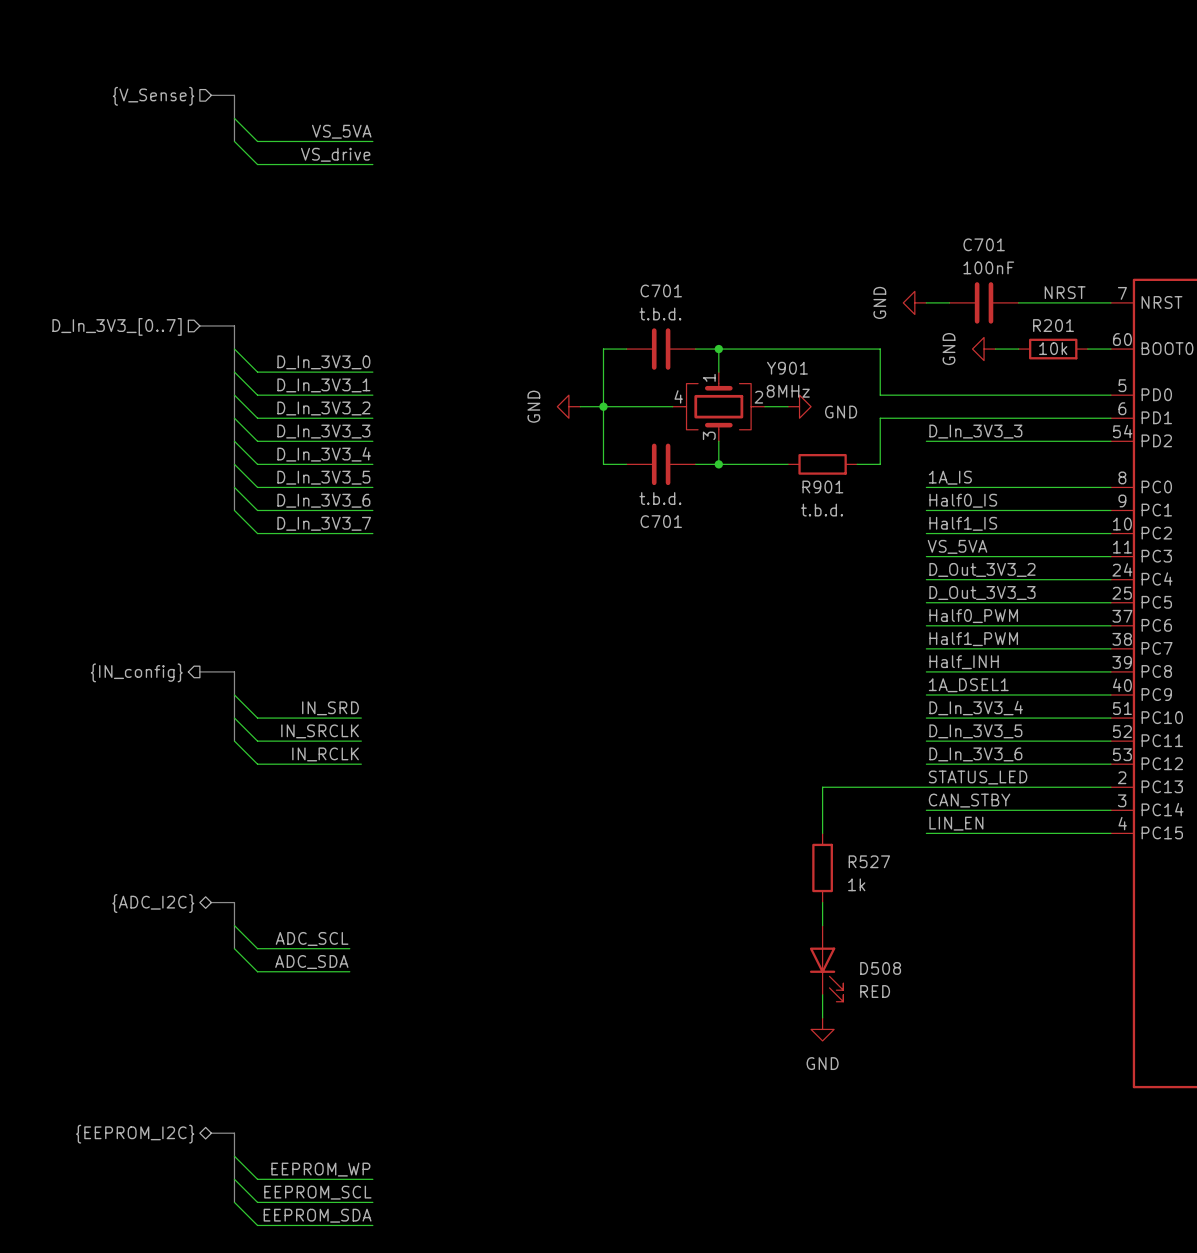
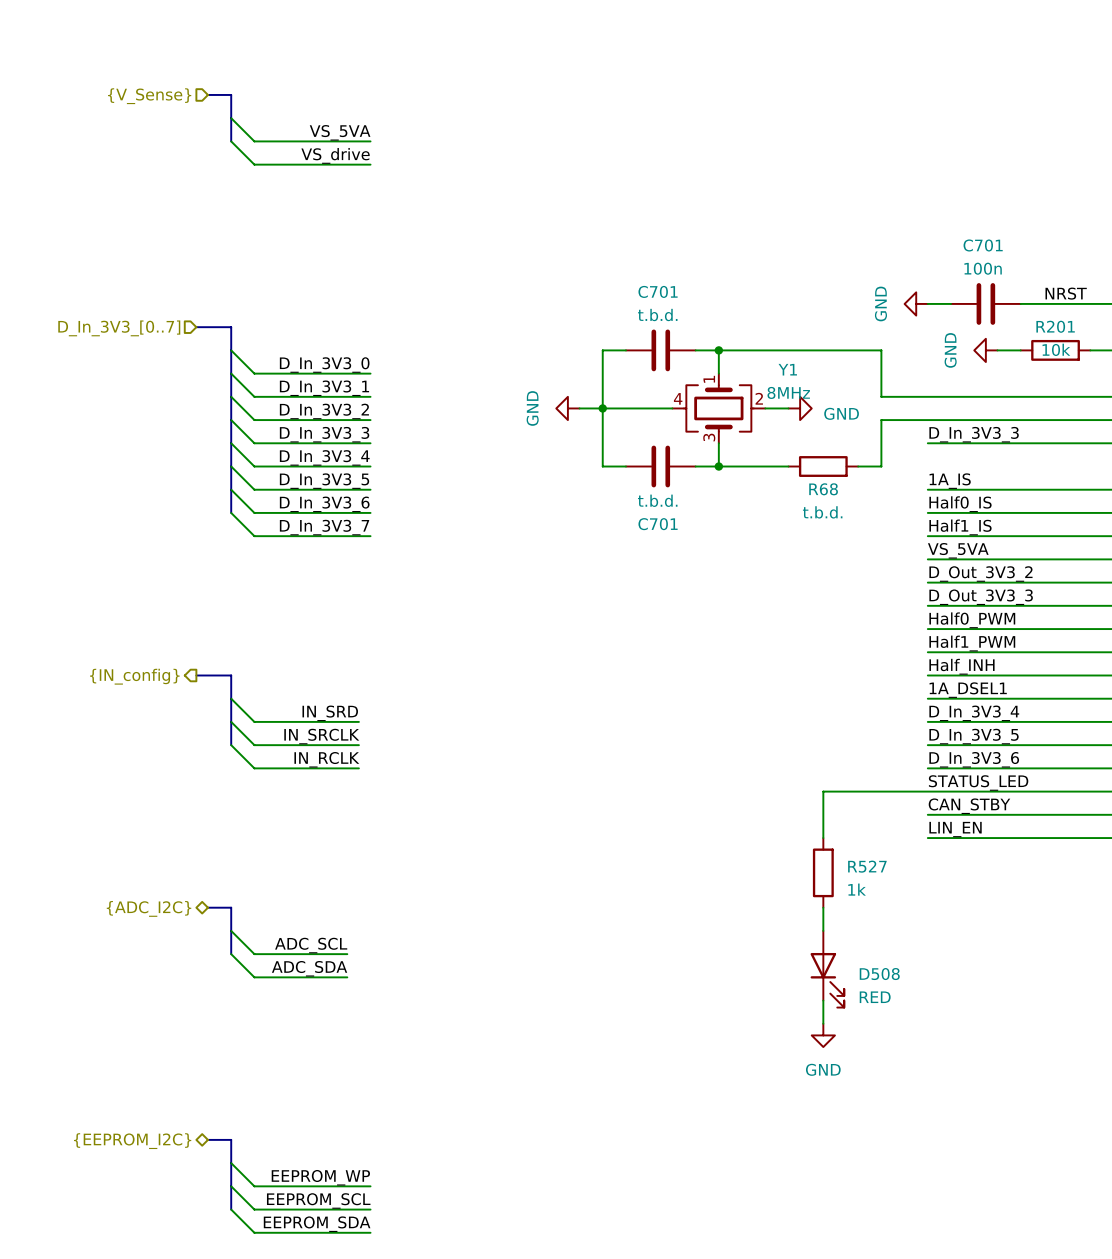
C701 value: 100nF (988, 267) -> 100n (983, 268)
Y901 name: Y901 (787, 368) -> Y1 (787, 369)
R901 name: R901 (822, 486) -> R68 (823, 489)

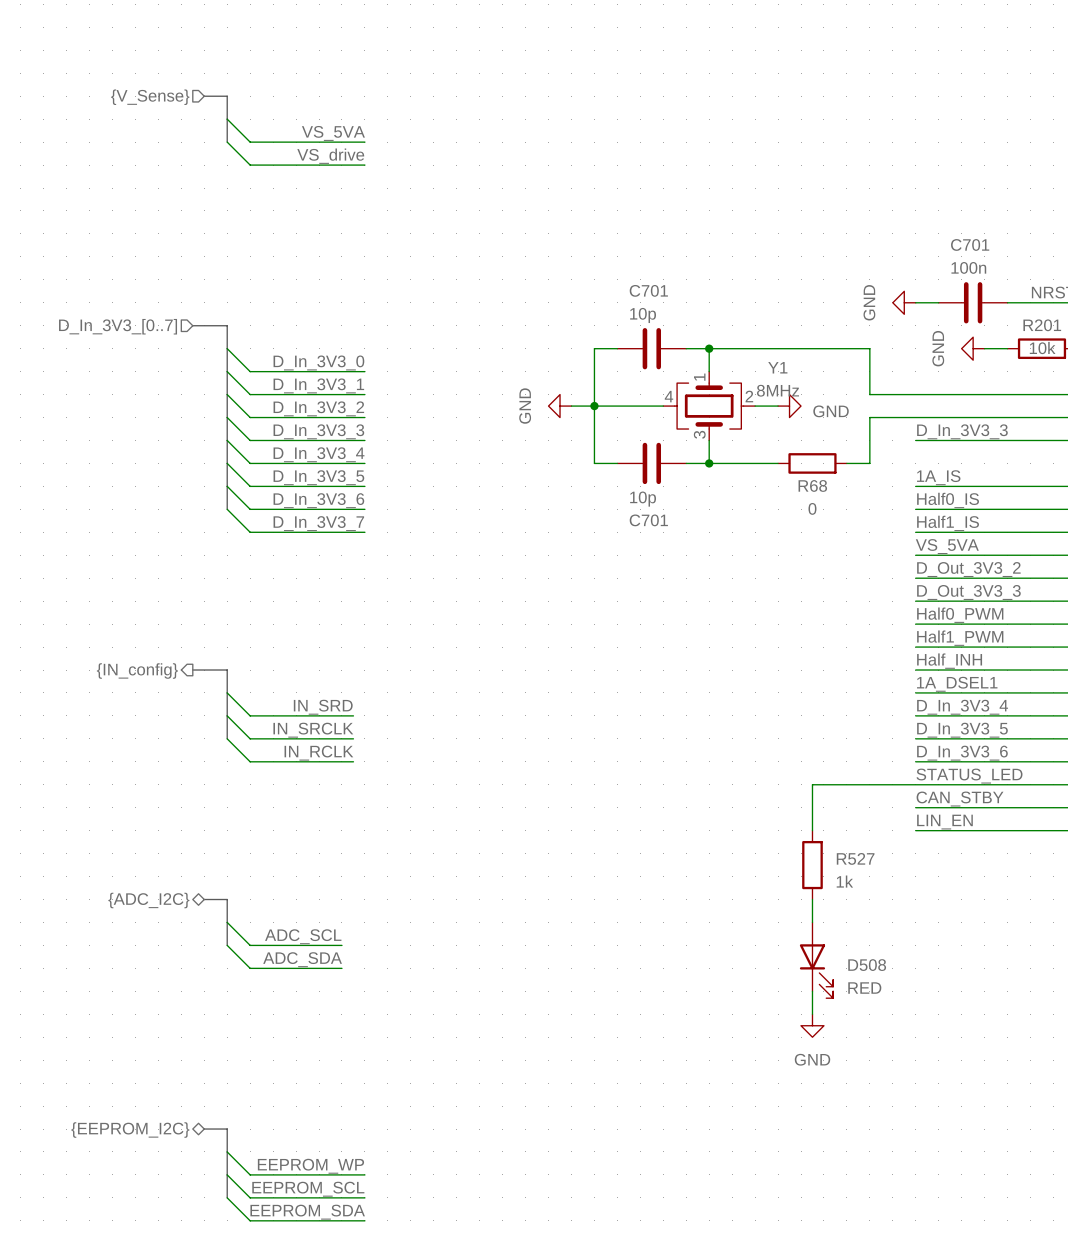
C701 value: t.b.d. (657, 315) -> 10p (643, 315)
C701 value: t.b.d. (657, 500) -> 10p (643, 499)
R68 value: t.b.d. (822, 512) -> 0 (812, 508)

